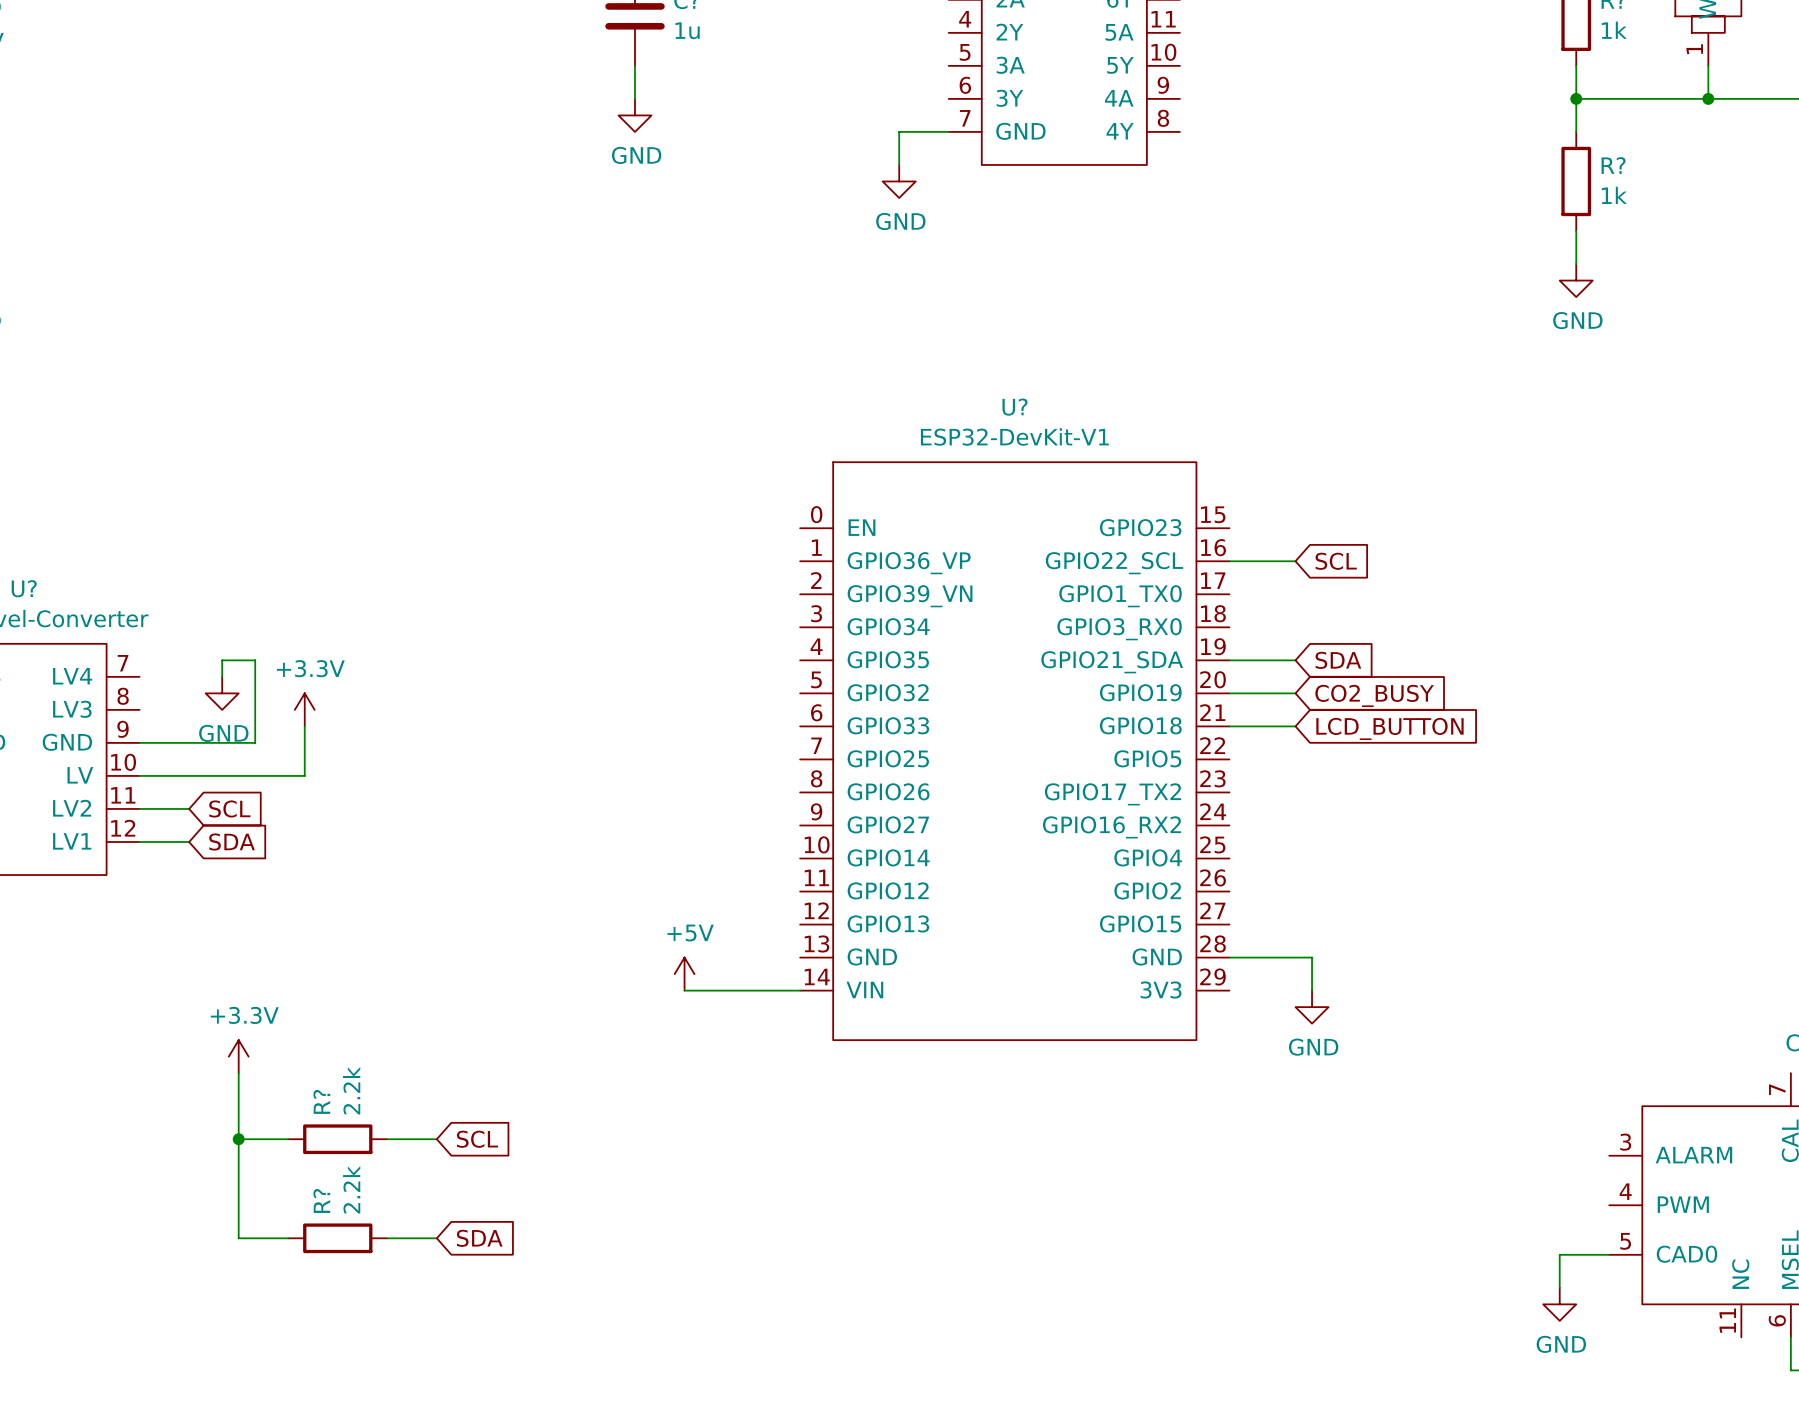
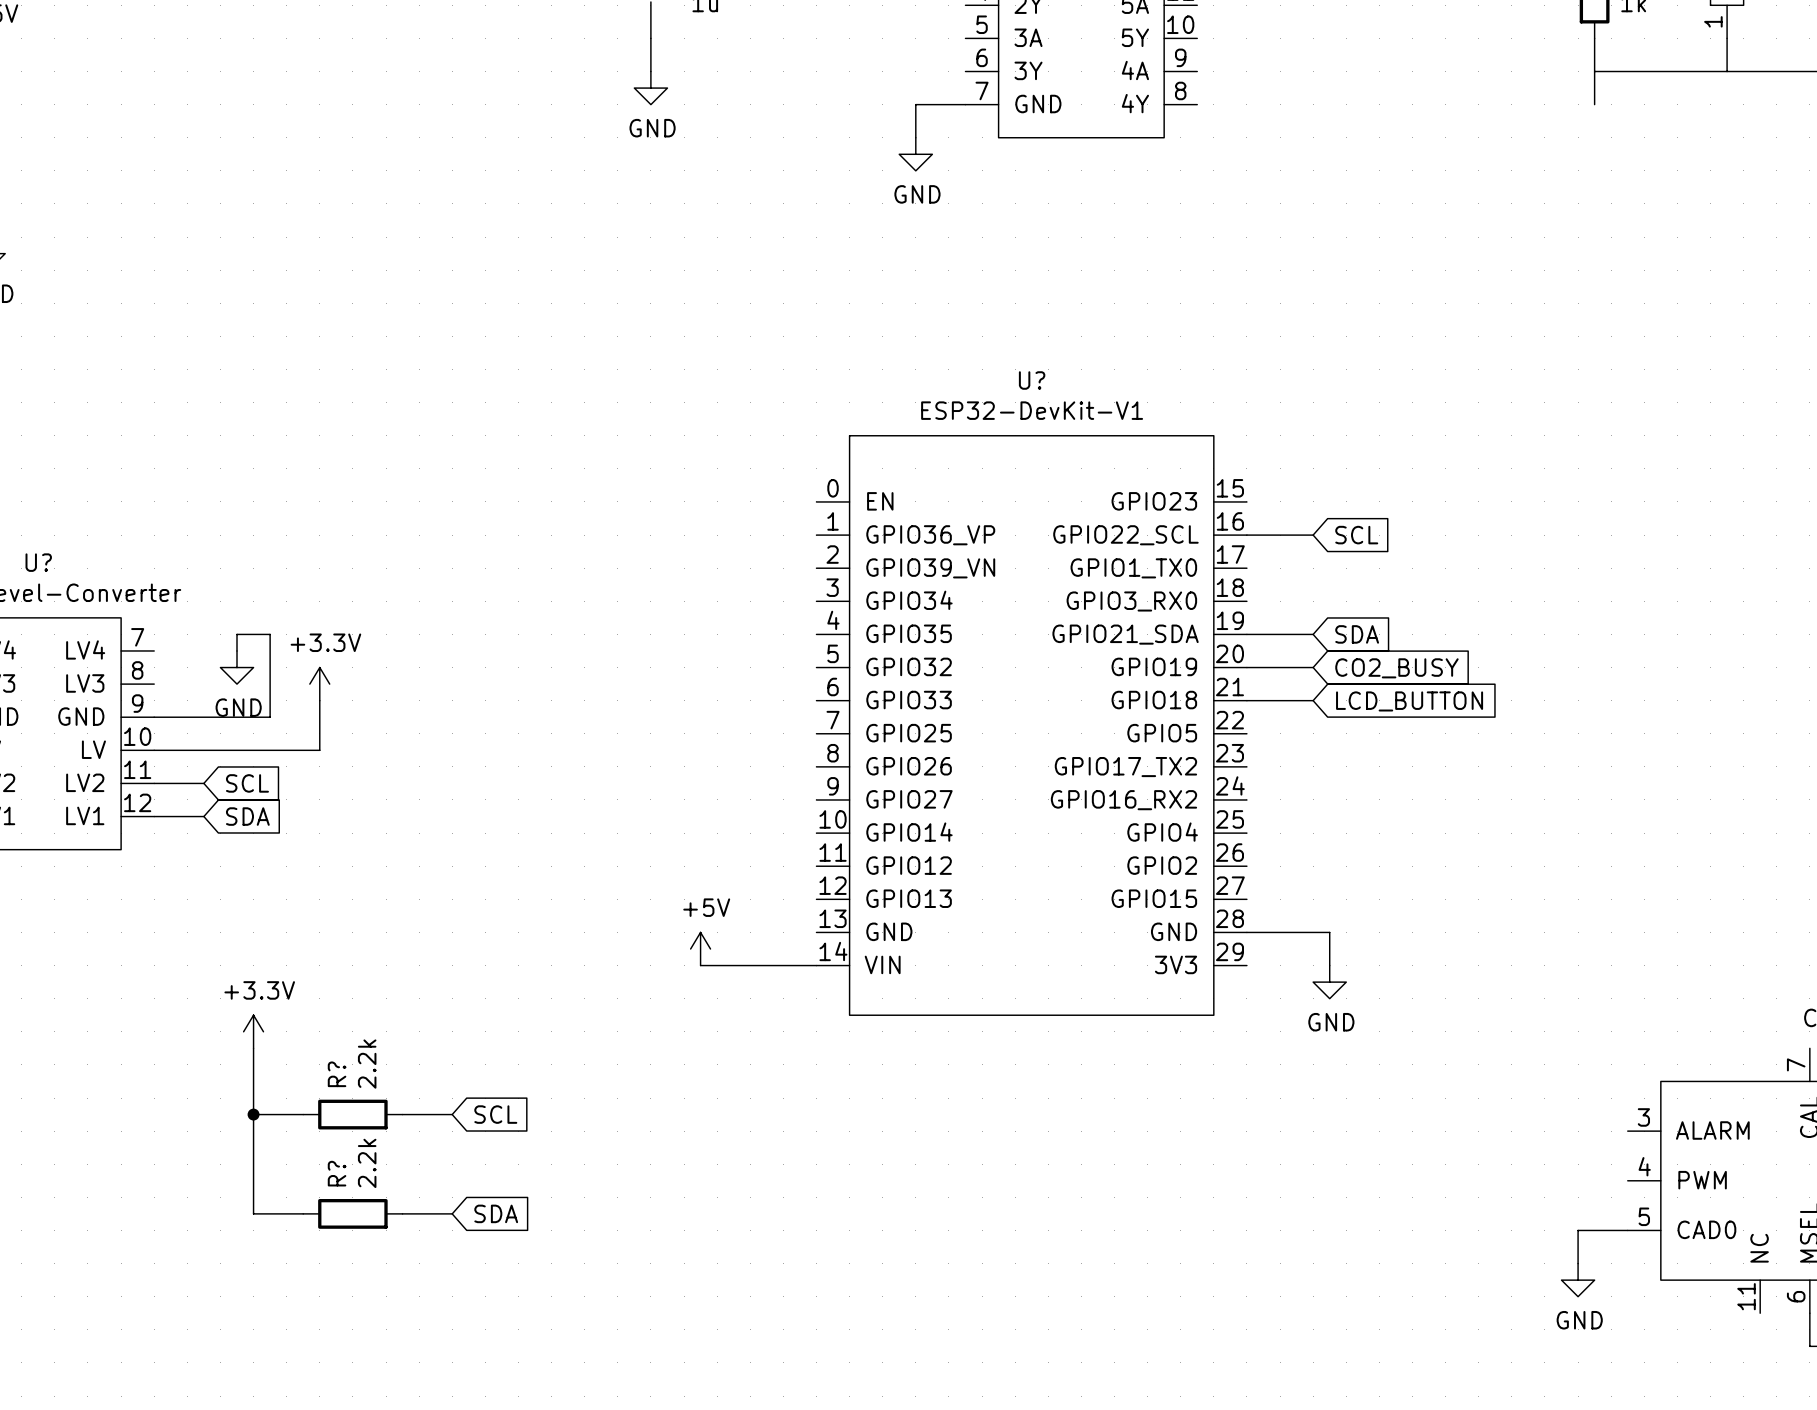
junction: (1576, 98) -> none
junction: (1708, 98) -> none
R?: 1k (1576, 181) -> none
wire: (1576, 231) (1576, 264) -> none
power symbol: GND (1576, 280) -> none

